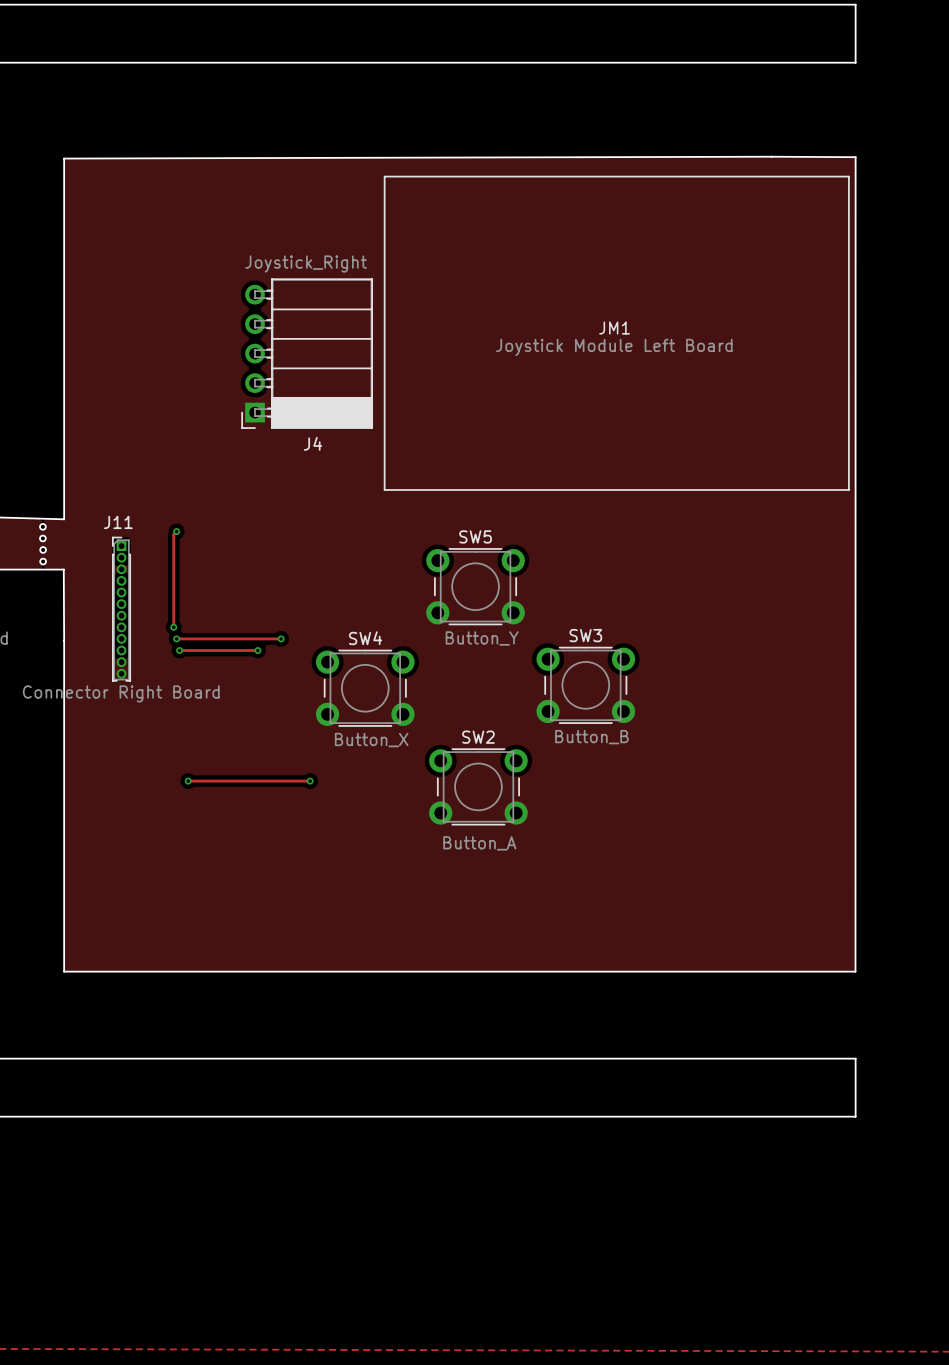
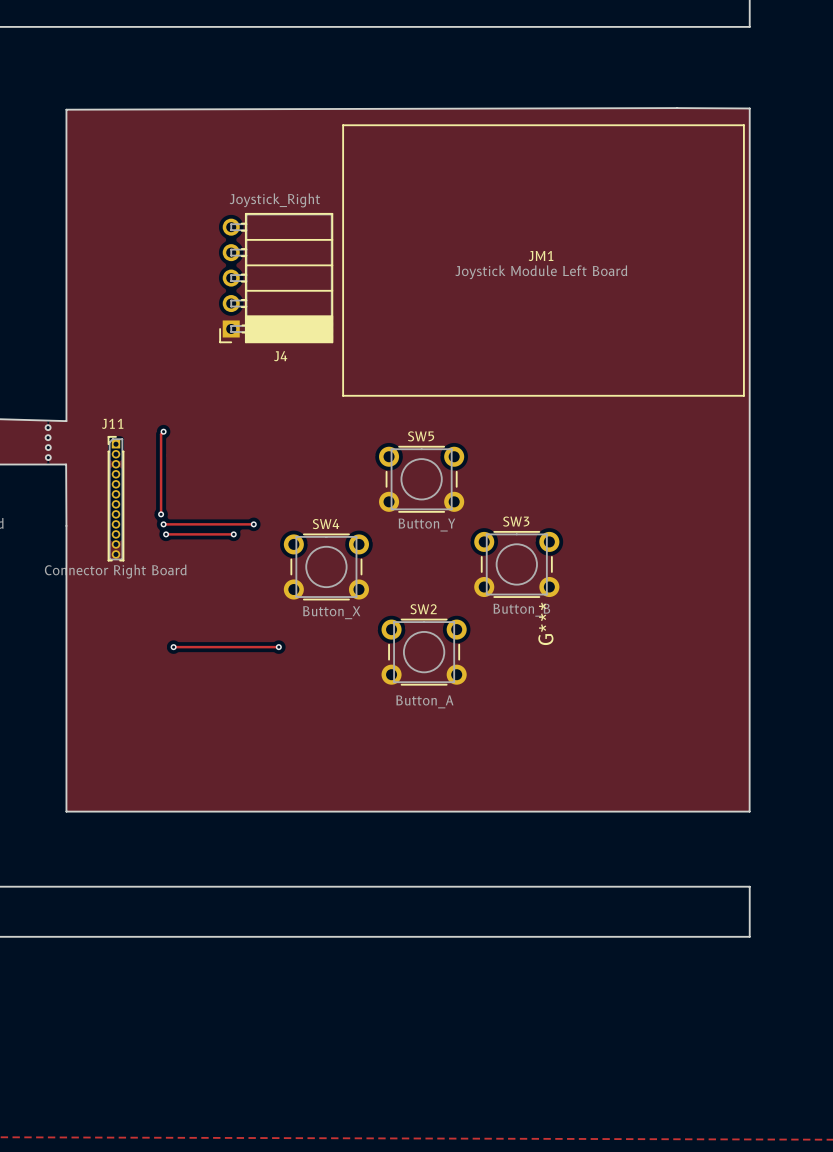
G***: none -> (545, 623)

